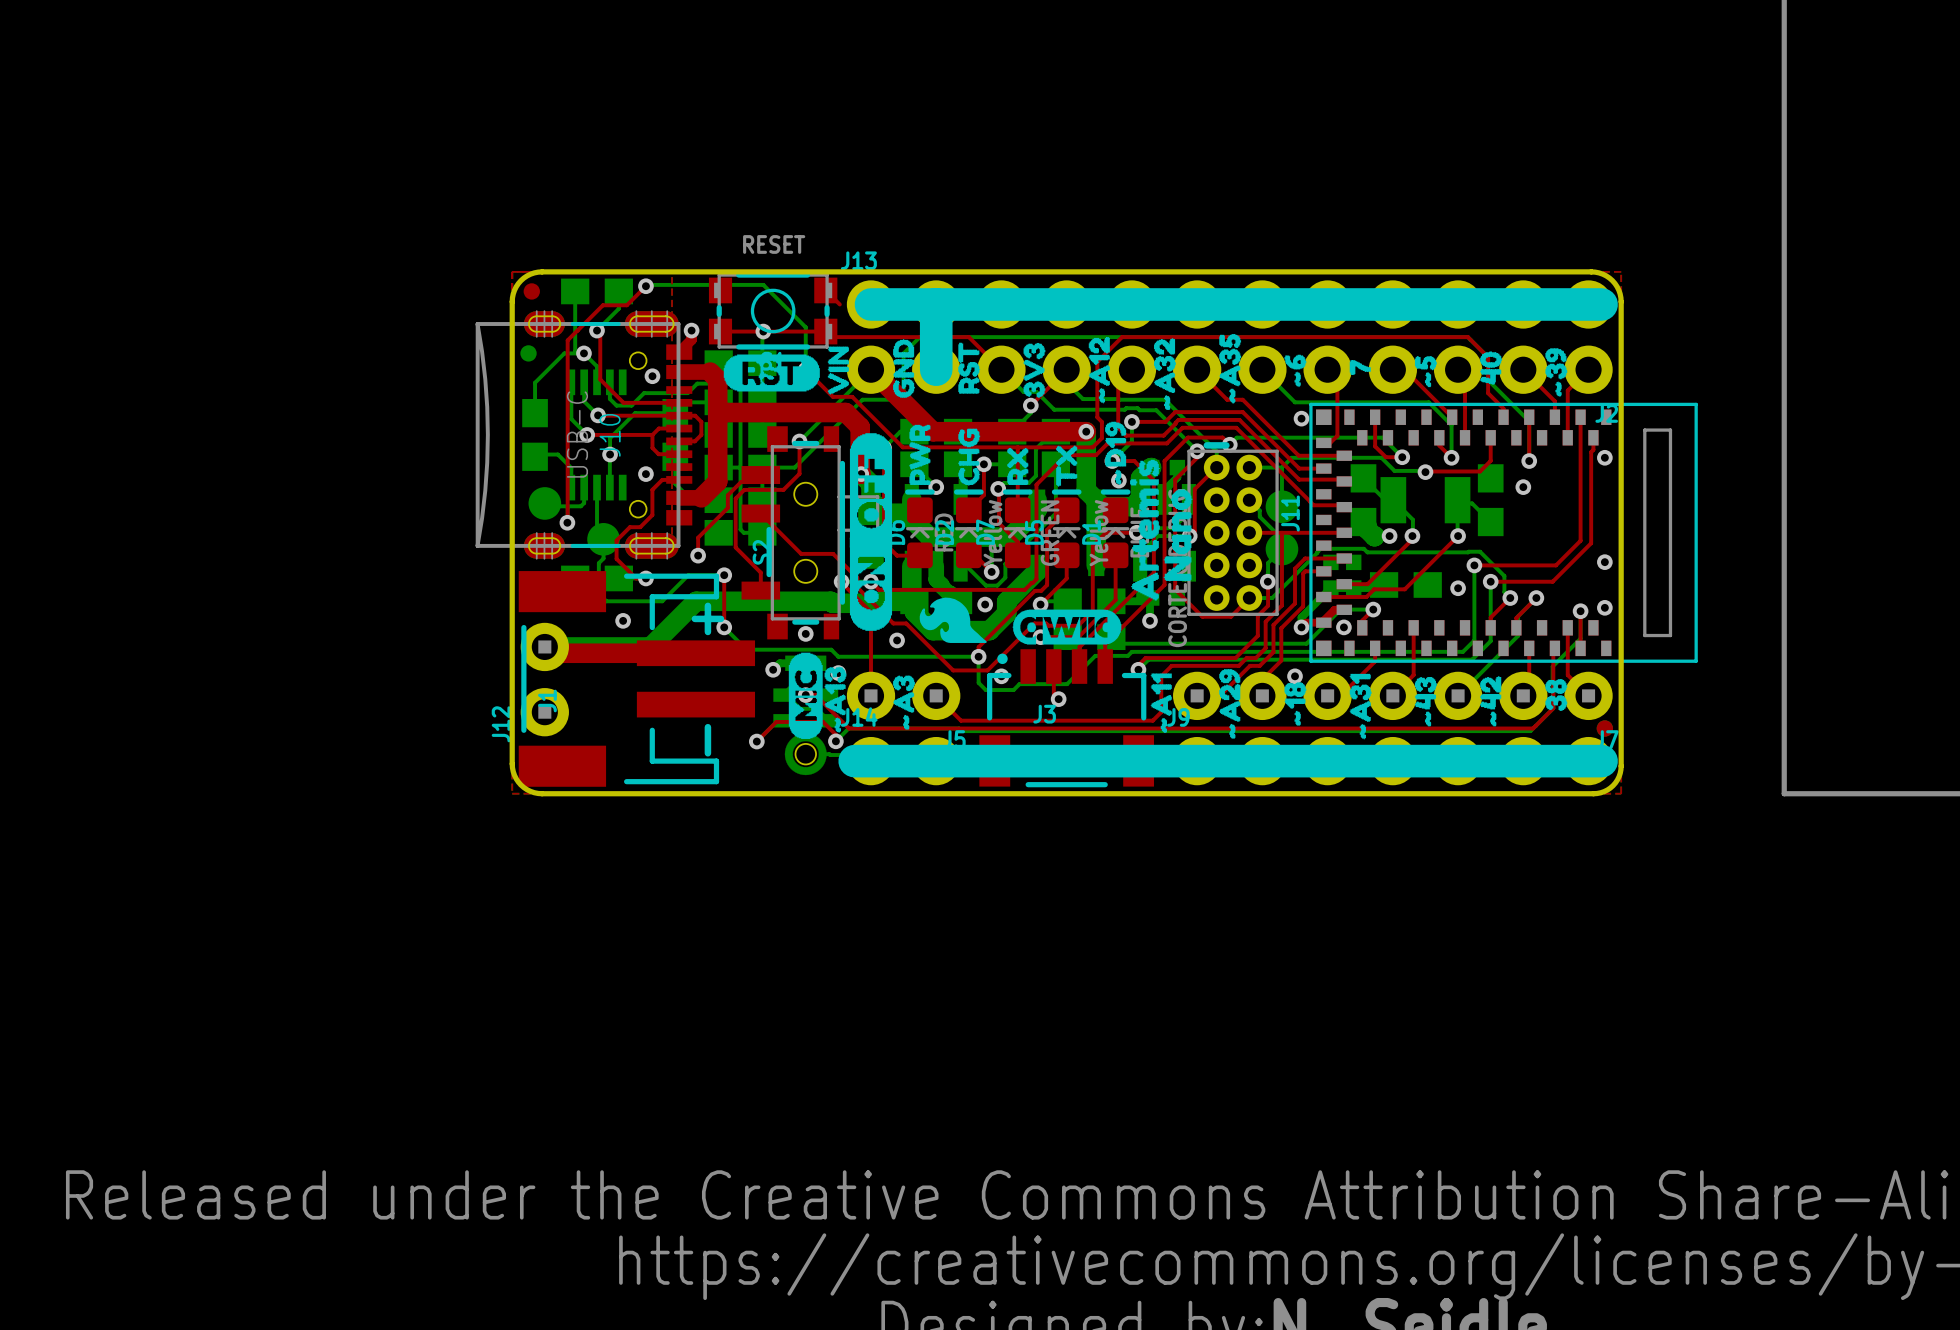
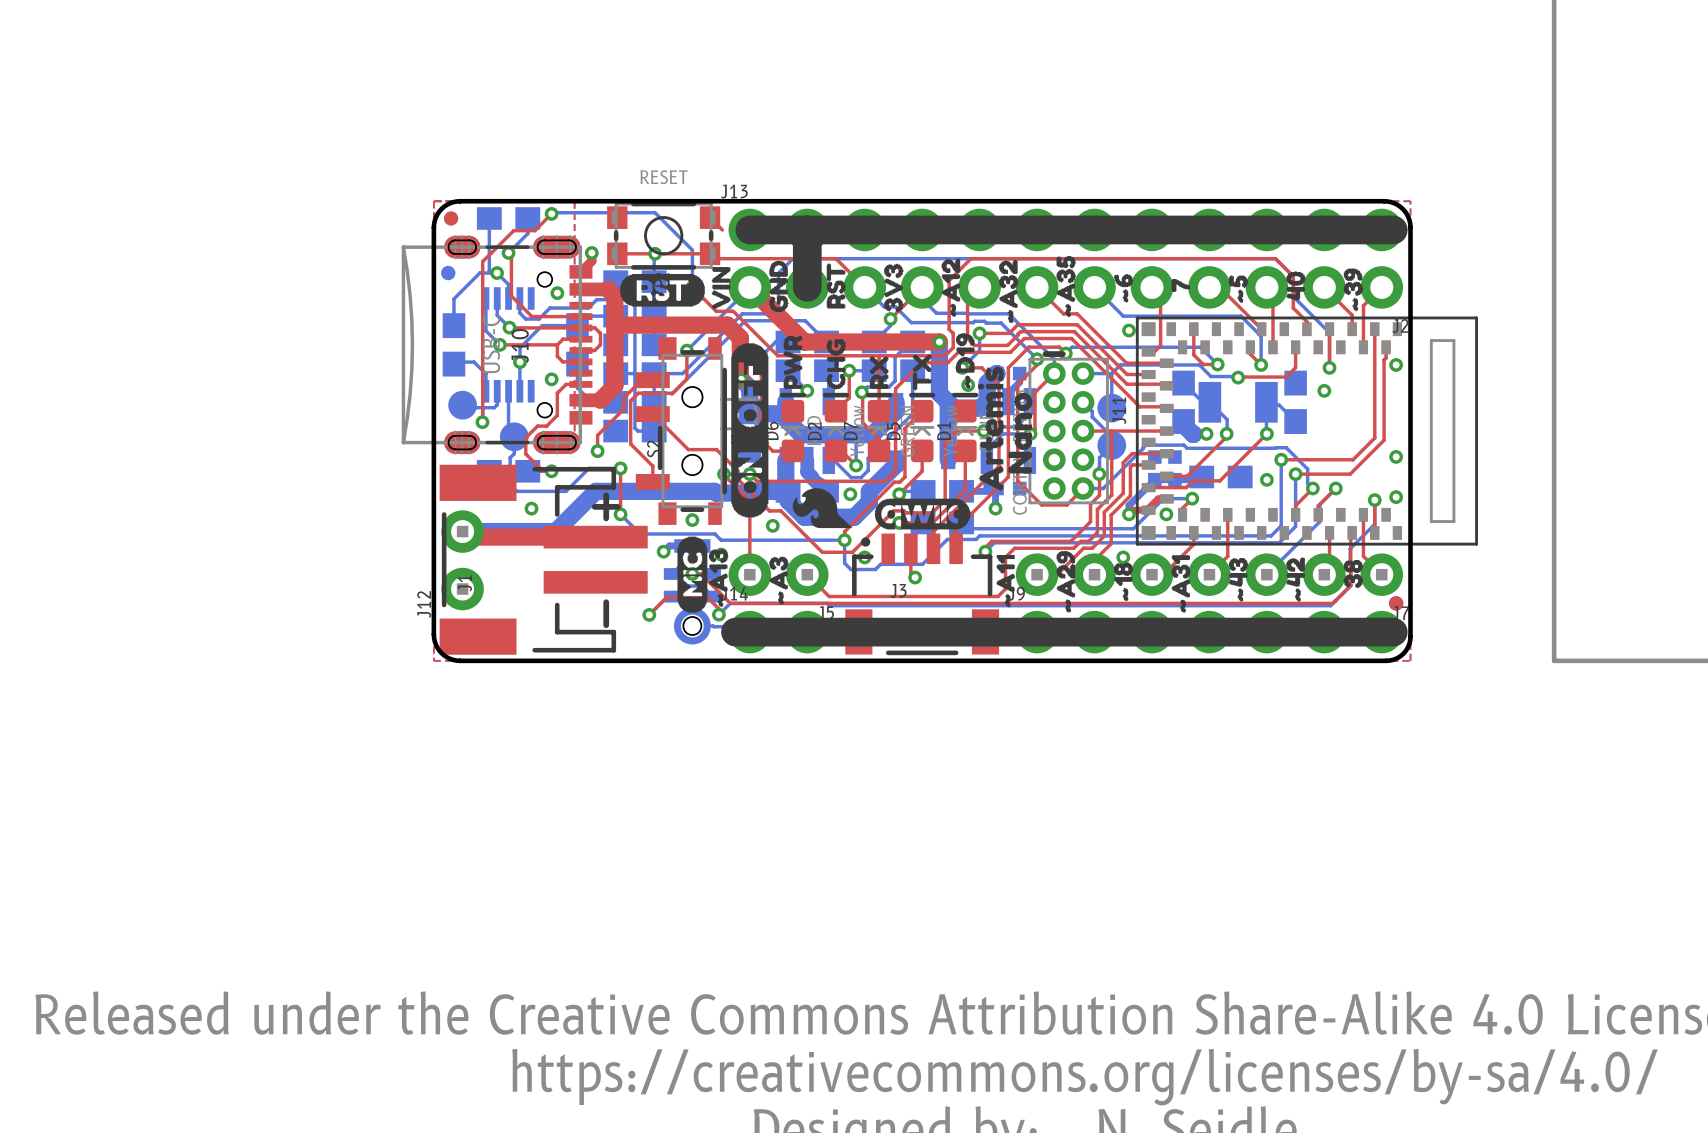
bottom track: none -> (826, 342) (805, 320) (745, 320) (671, 394)

